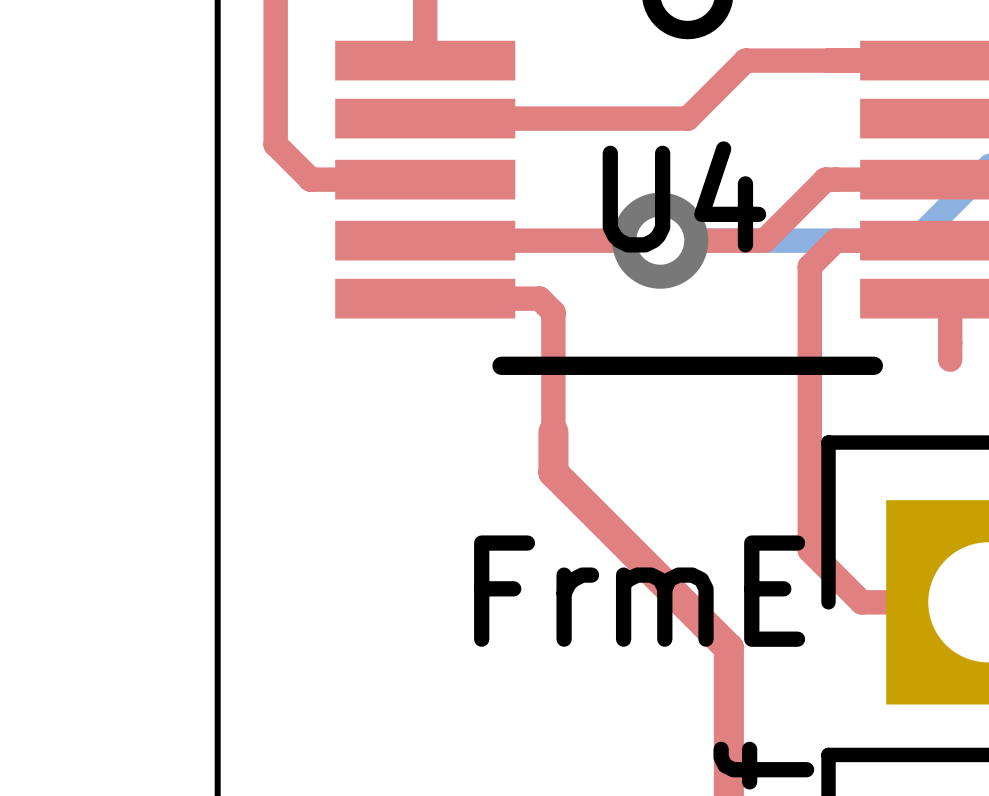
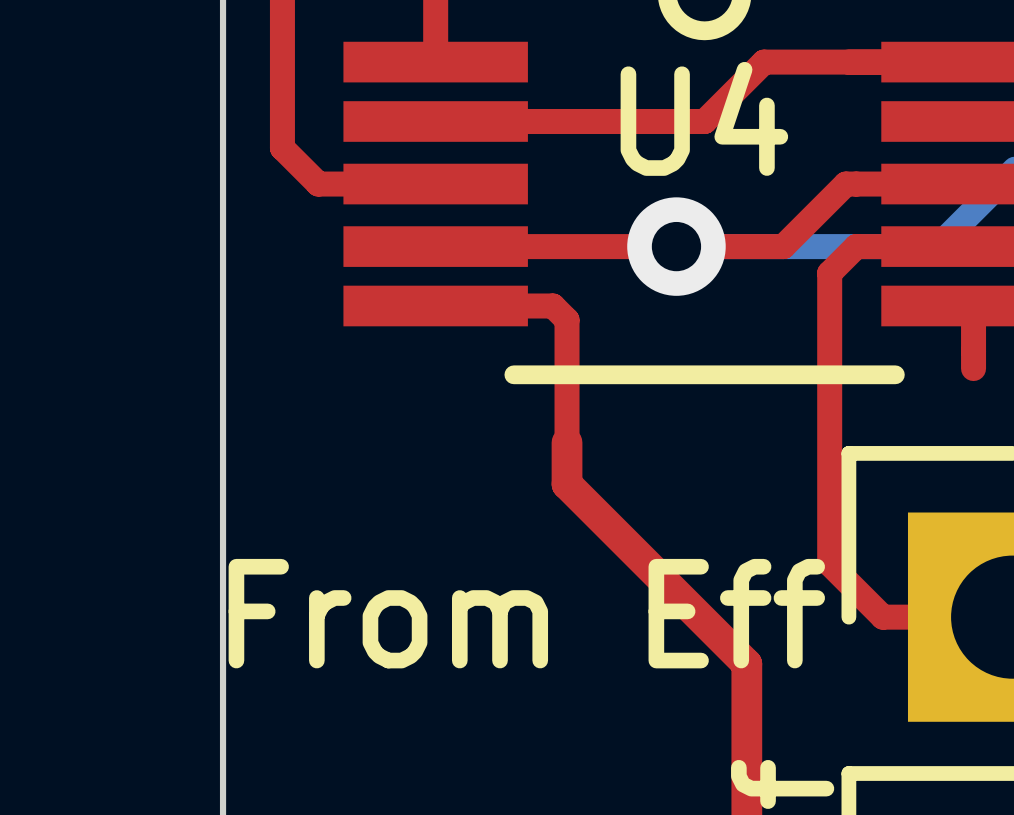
U4 name position: U4 (684, 196) -> U4 (704, 118)
text: FrmE (639, 591) -> From Eff (526, 613)

